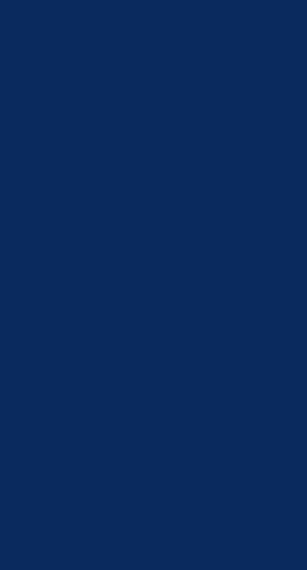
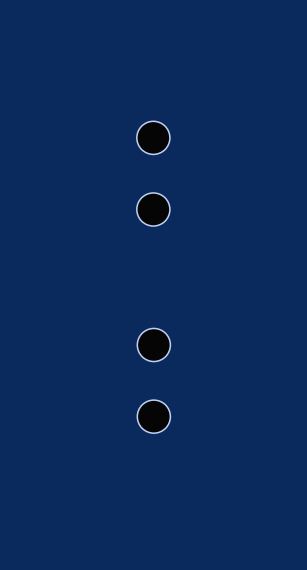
part: none -> (153, 173)
part: none -> (153, 380)

